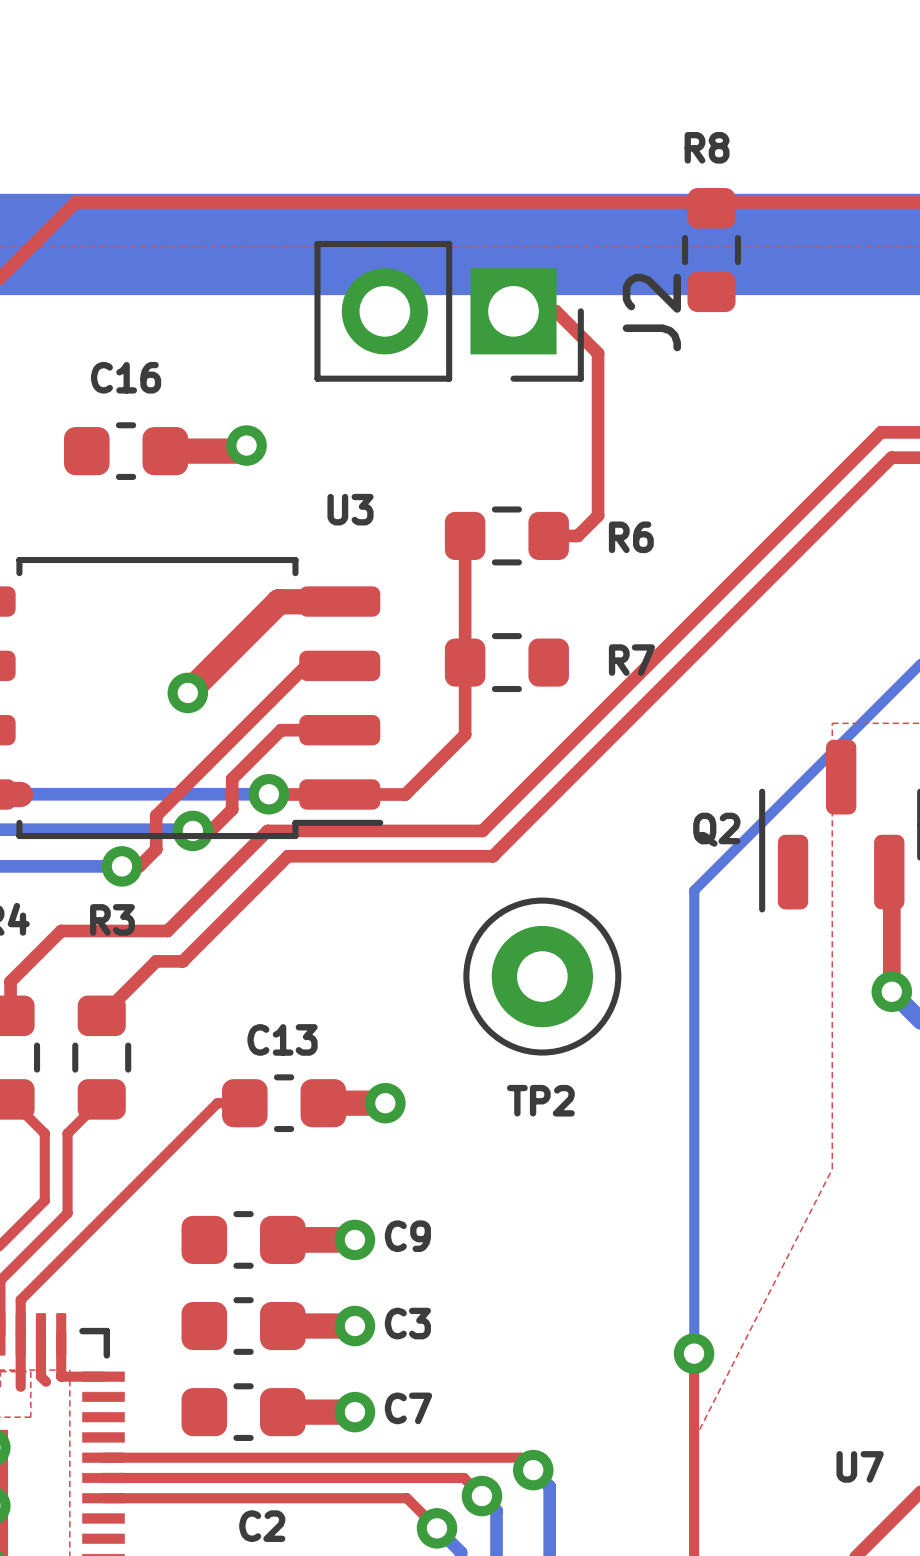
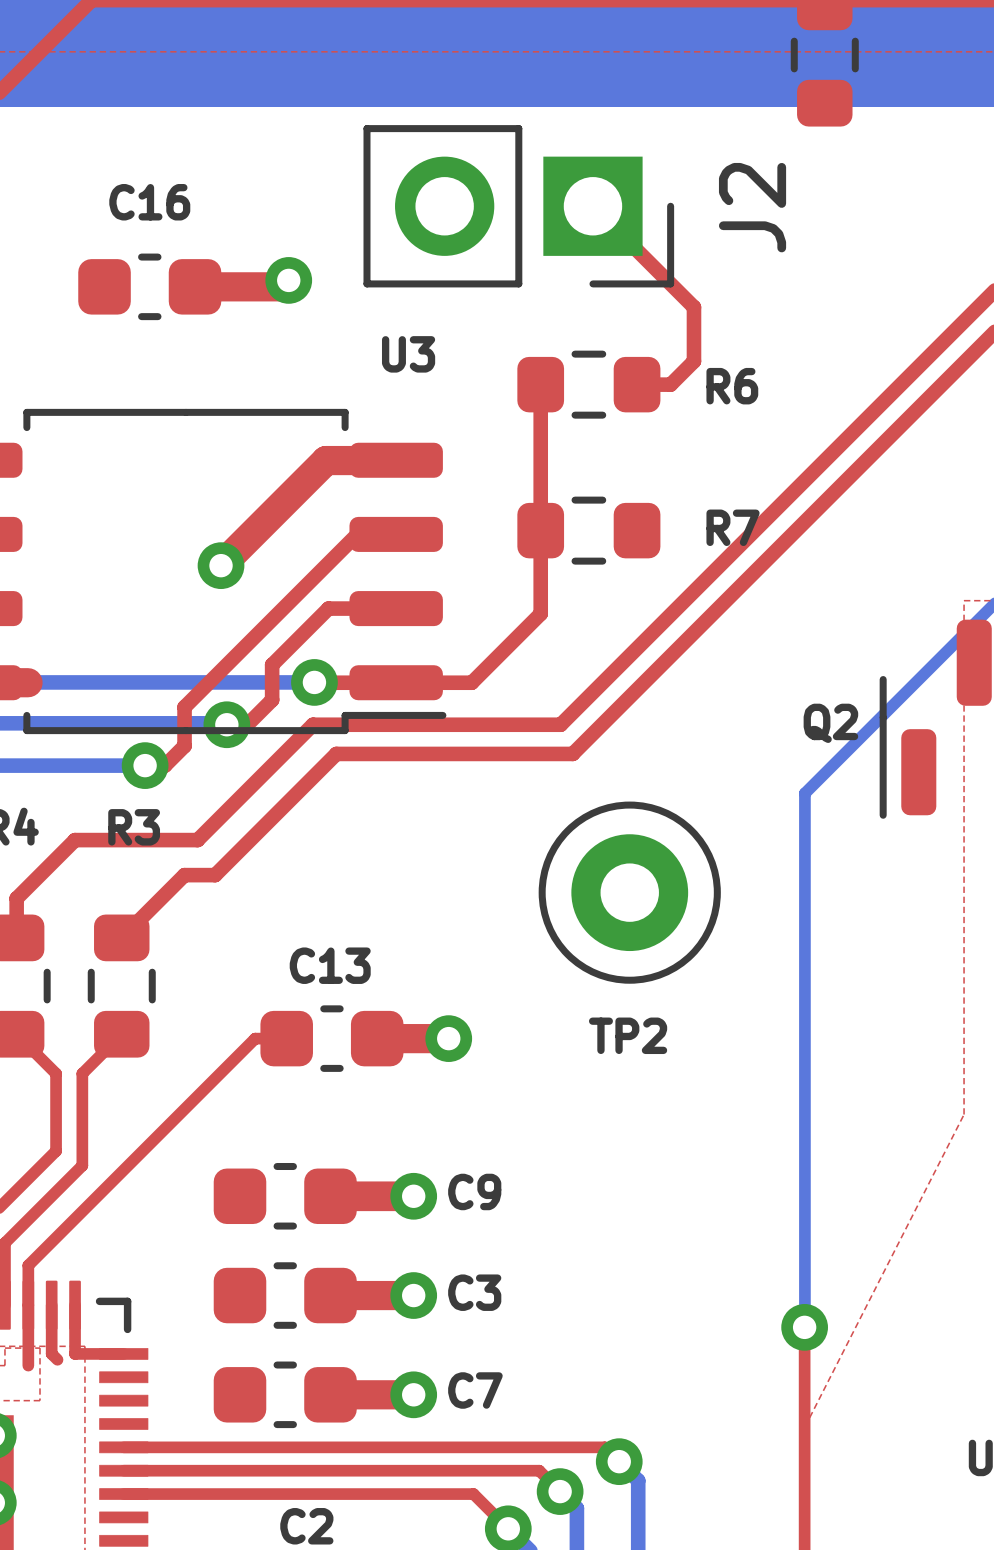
J2 position: (449, 311) -> (518, 206)
top track: (513, 311) (556, 311) (598, 353) (598, 468) -> (592, 206) (693, 307)

